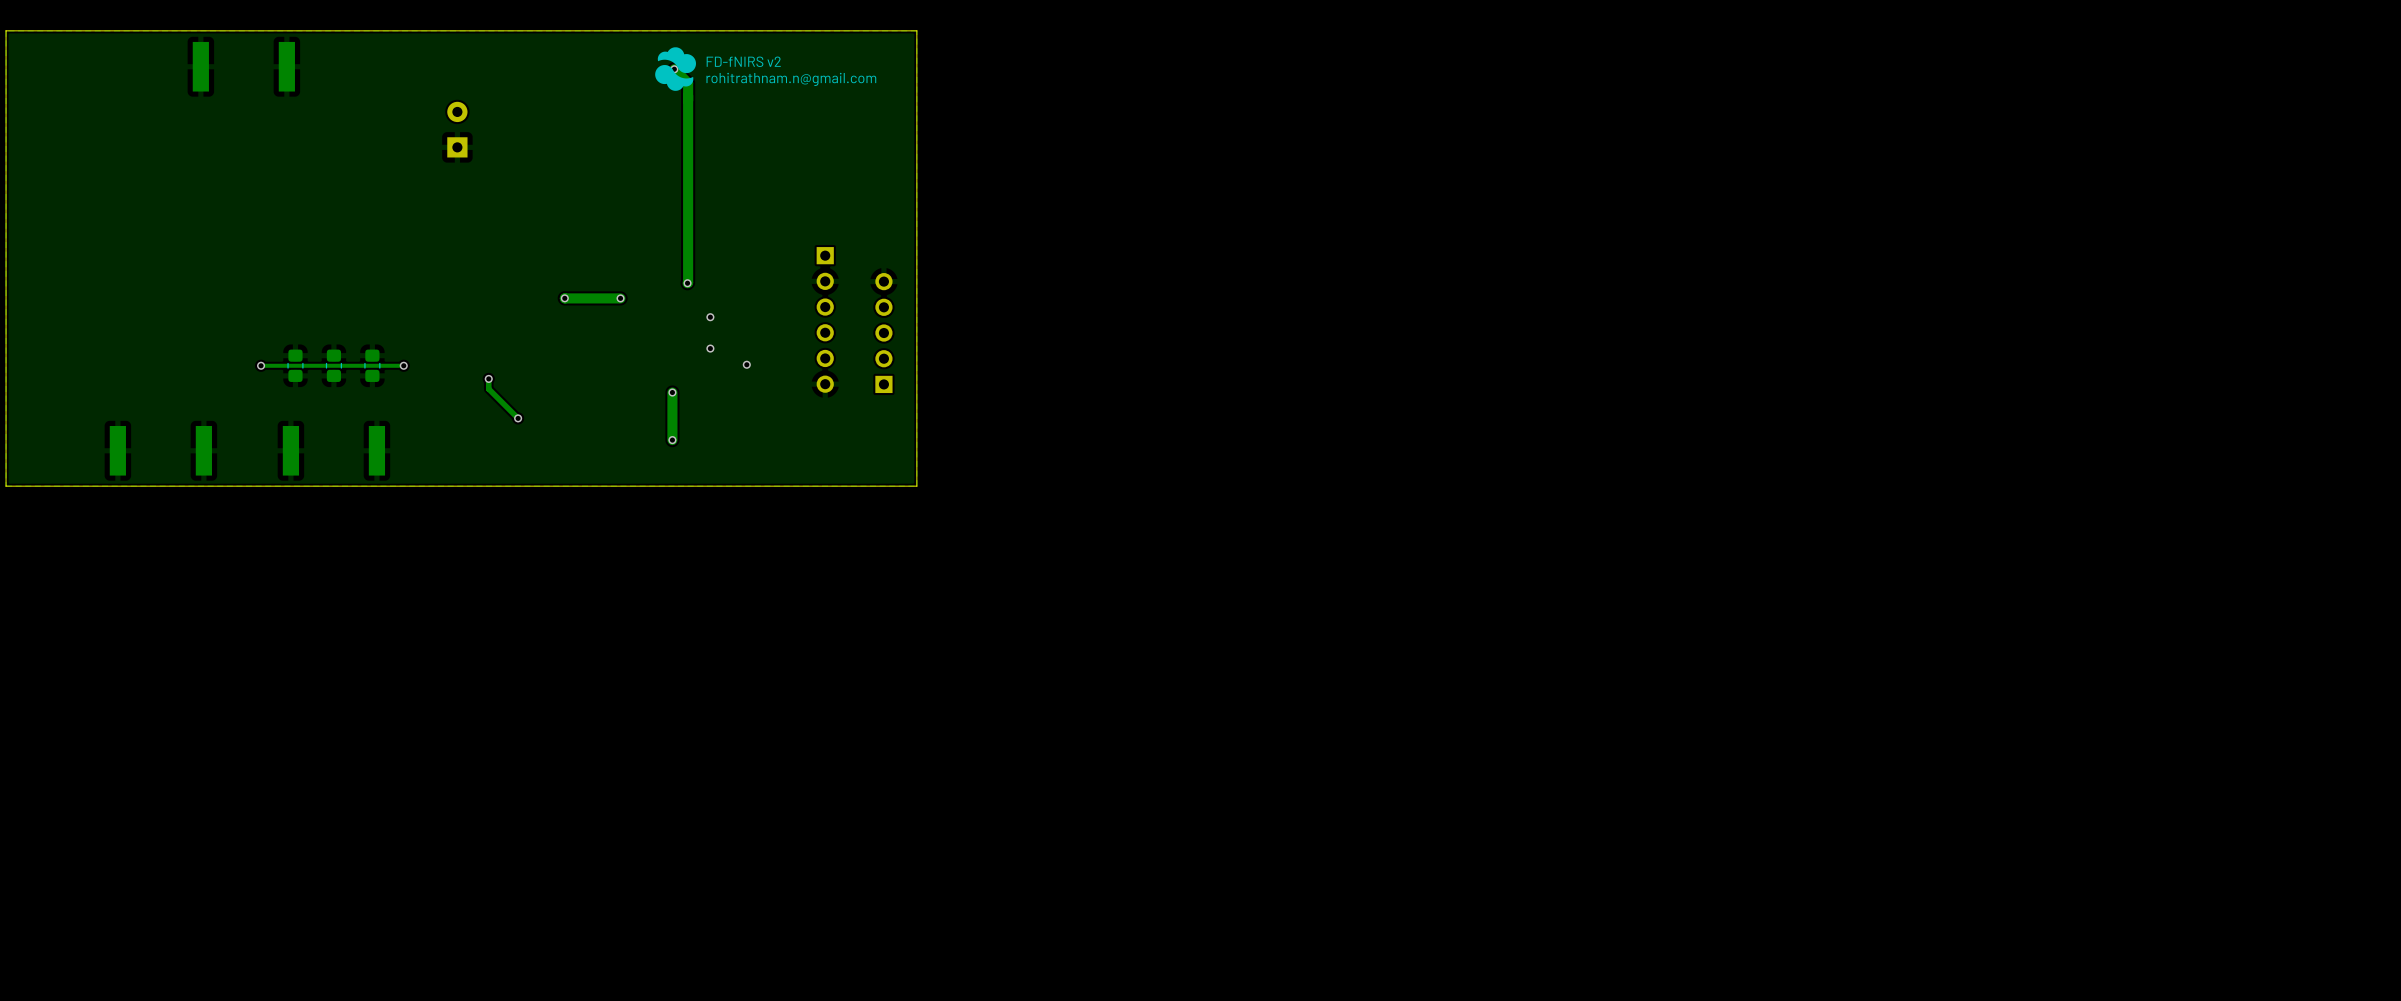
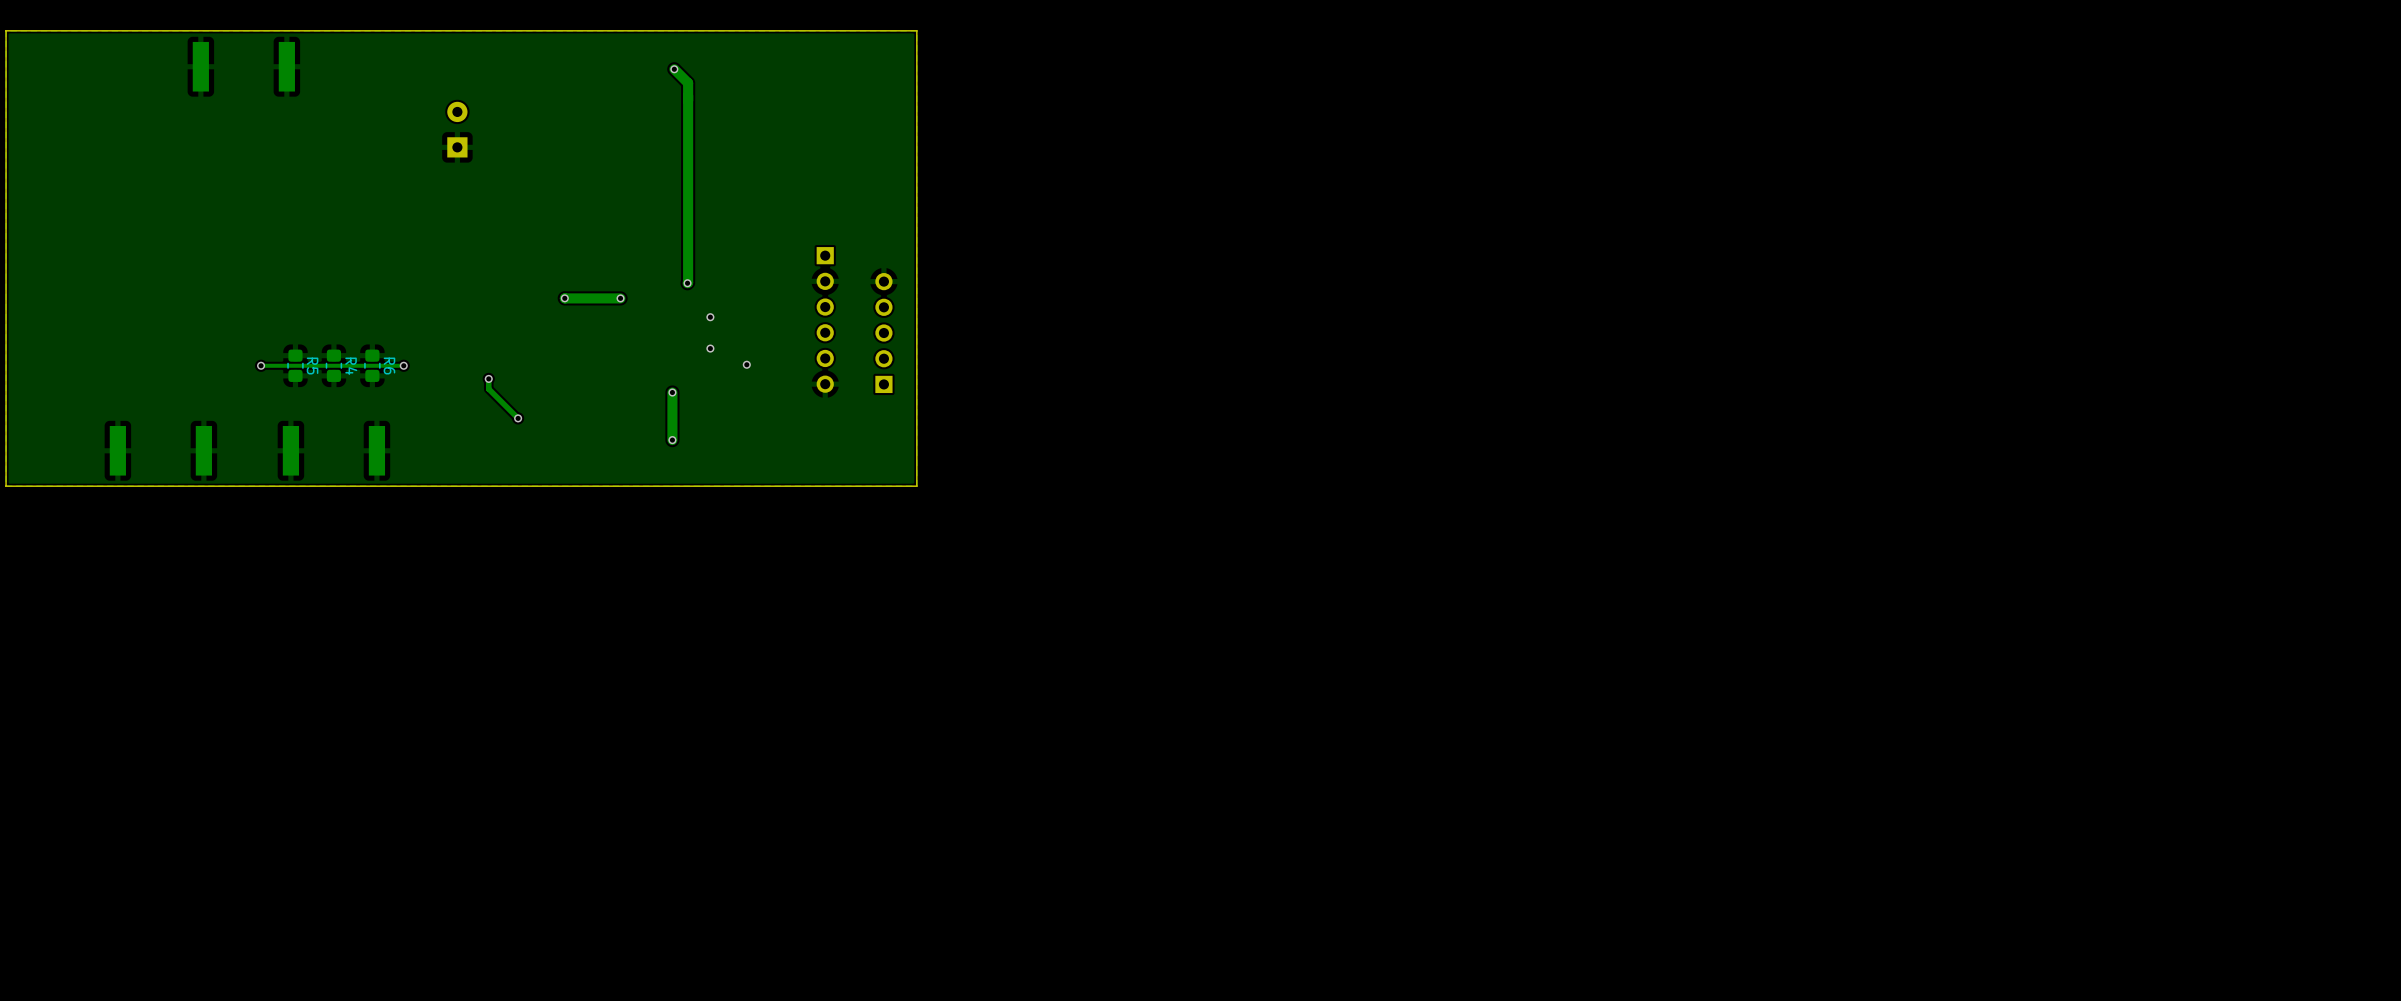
drawing: [655, 47, 697, 91] -> none
text: FD-fNIRS v2 (743, 61) -> none
text: rohitrathnam.n@gmail.com (791, 79) -> none
R5 name: none -> R5 (312, 366)
R4 name: none -> R4 (351, 366)
R6 name: none -> R6 (389, 366)

